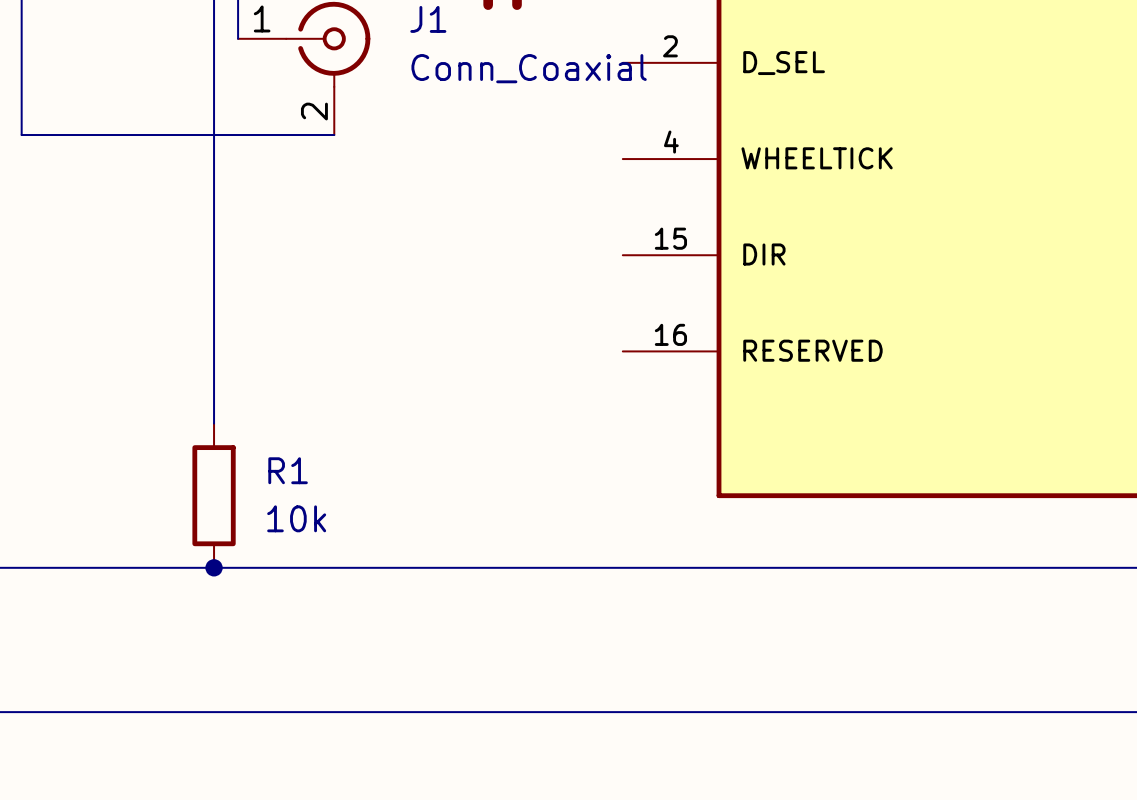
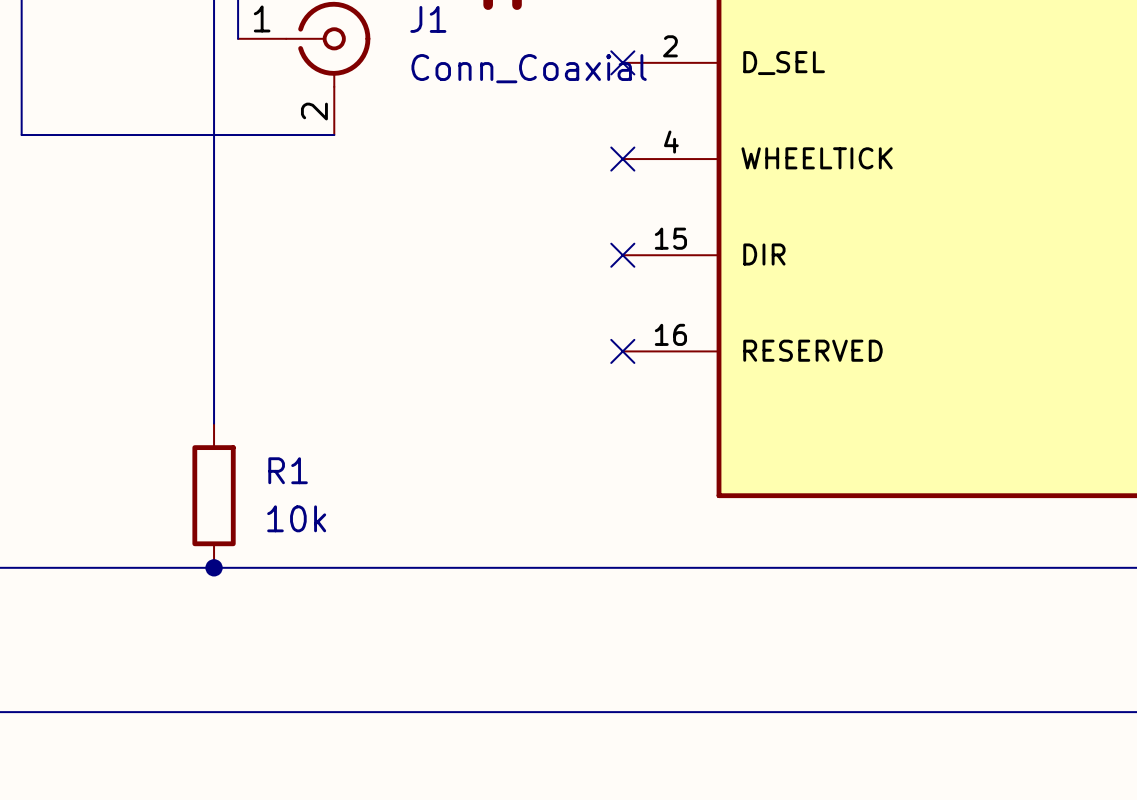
no-connect mark: none -> (622, 62)
no-connect mark: none -> (622, 159)
no-connect mark: none -> (622, 255)
no-connect mark: none -> (622, 351)

